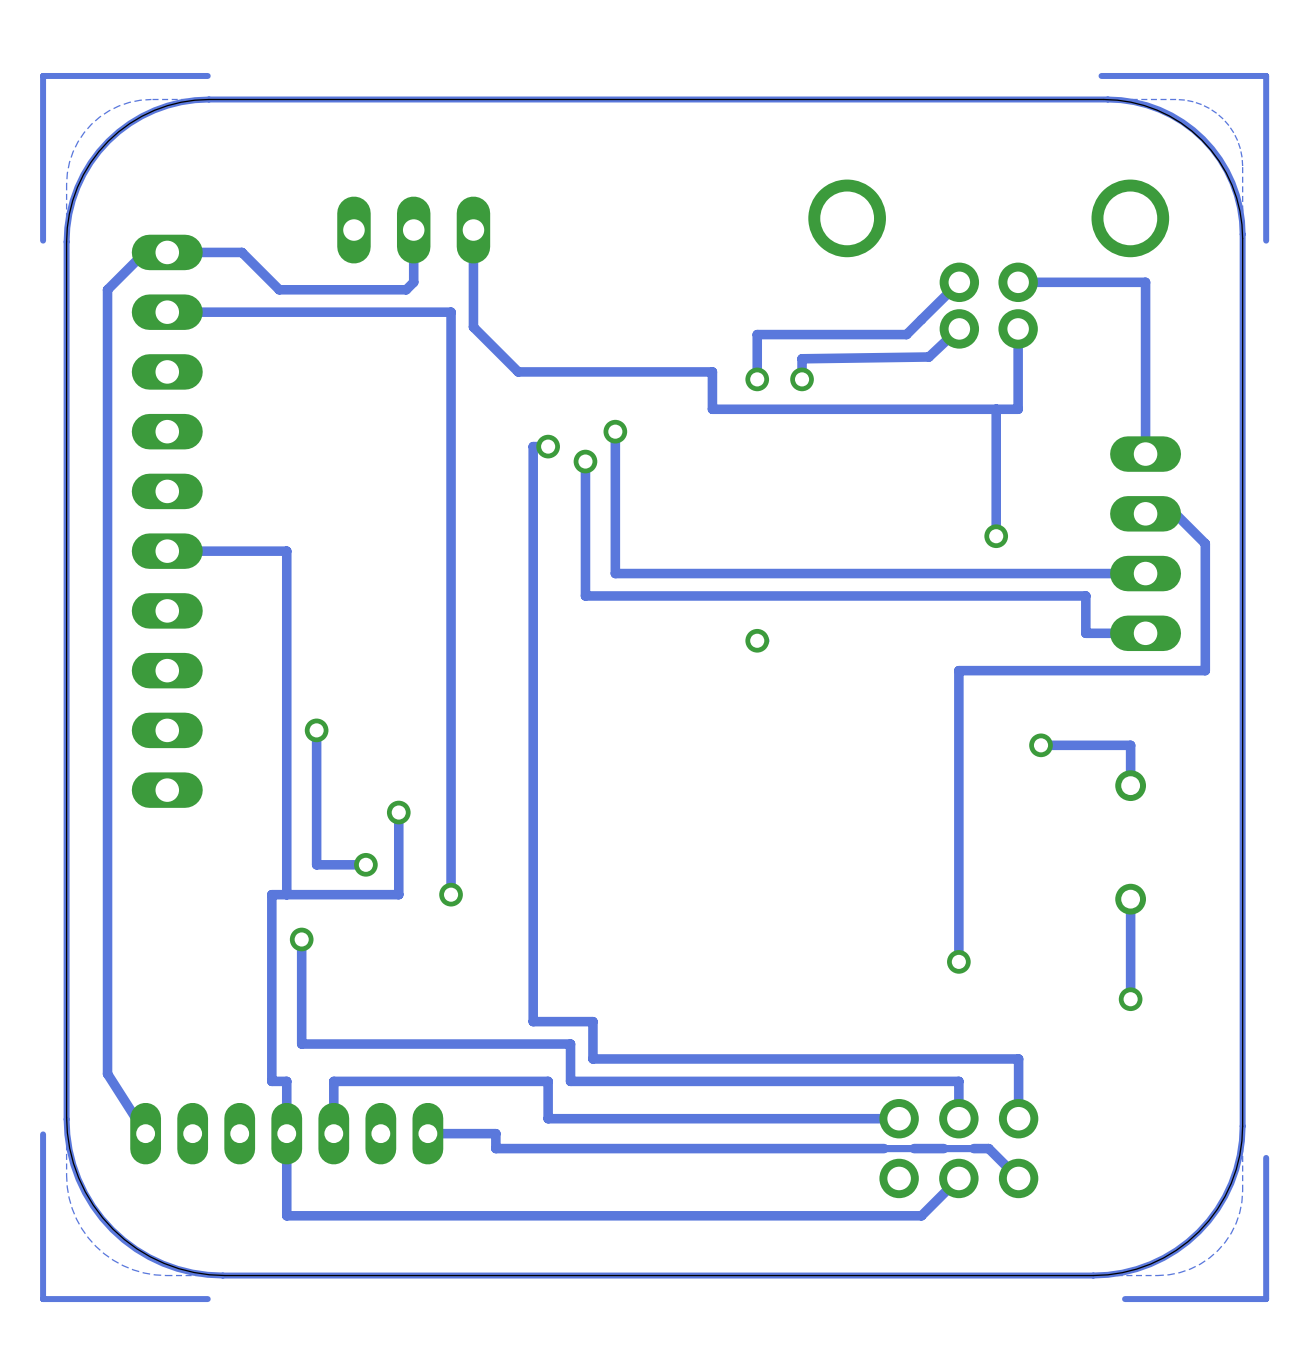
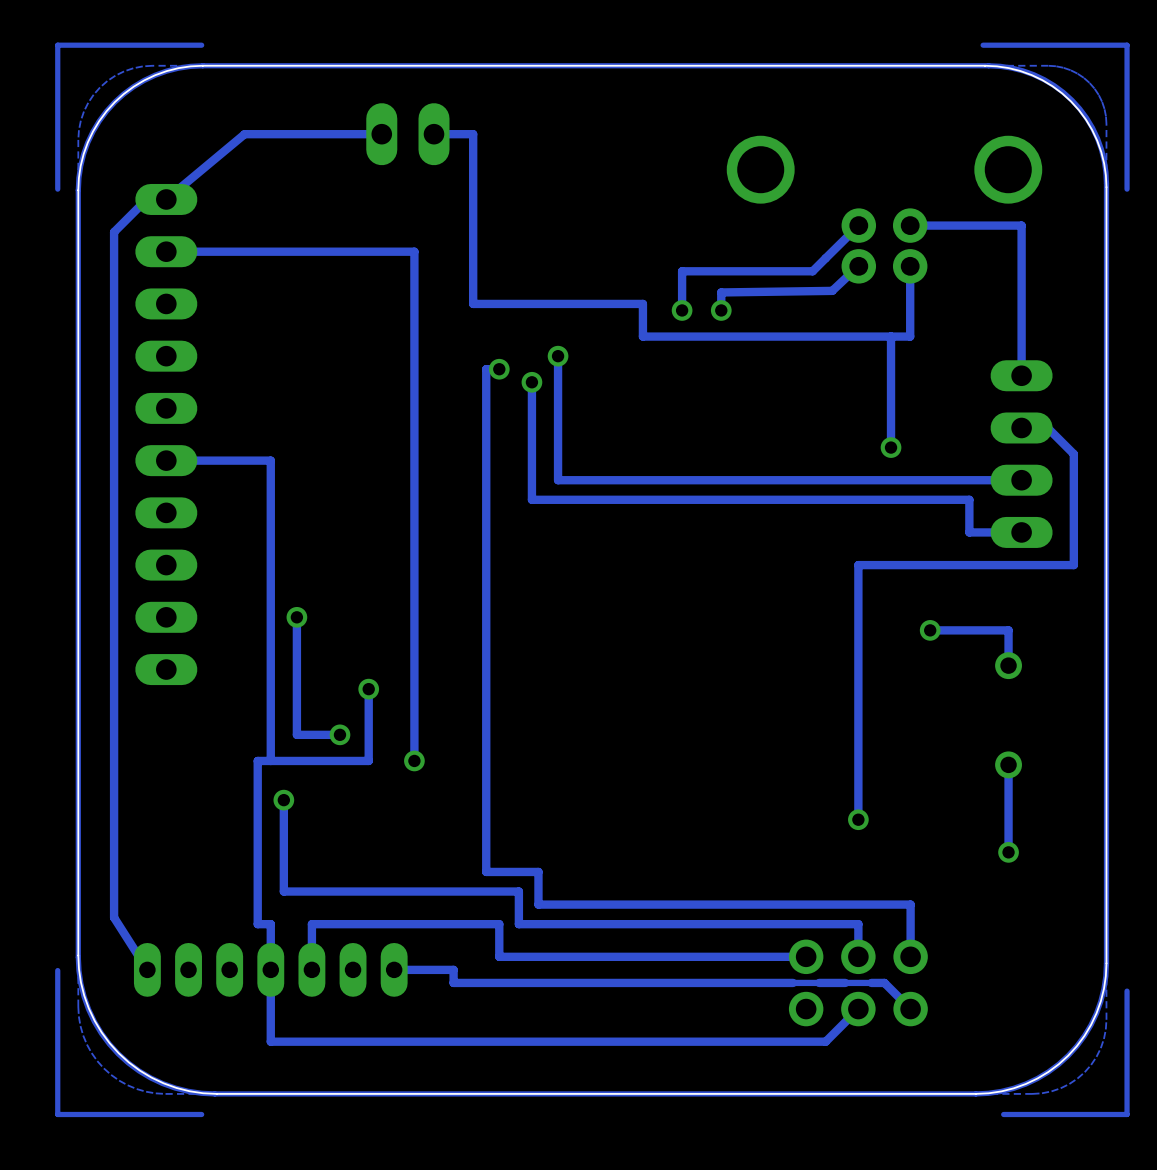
part: none -> (407, 134)
track: (413, 230) (413, 282) (406, 289) (279, 289) (241, 252) (167, 252) -> (381, 134) (244, 134) (166, 199)
part: (413, 230) -> none
track: (473, 230) (473, 327) (518, 371) -> (434, 134) (473, 134) (473, 303)
via: (757, 640) -> none

